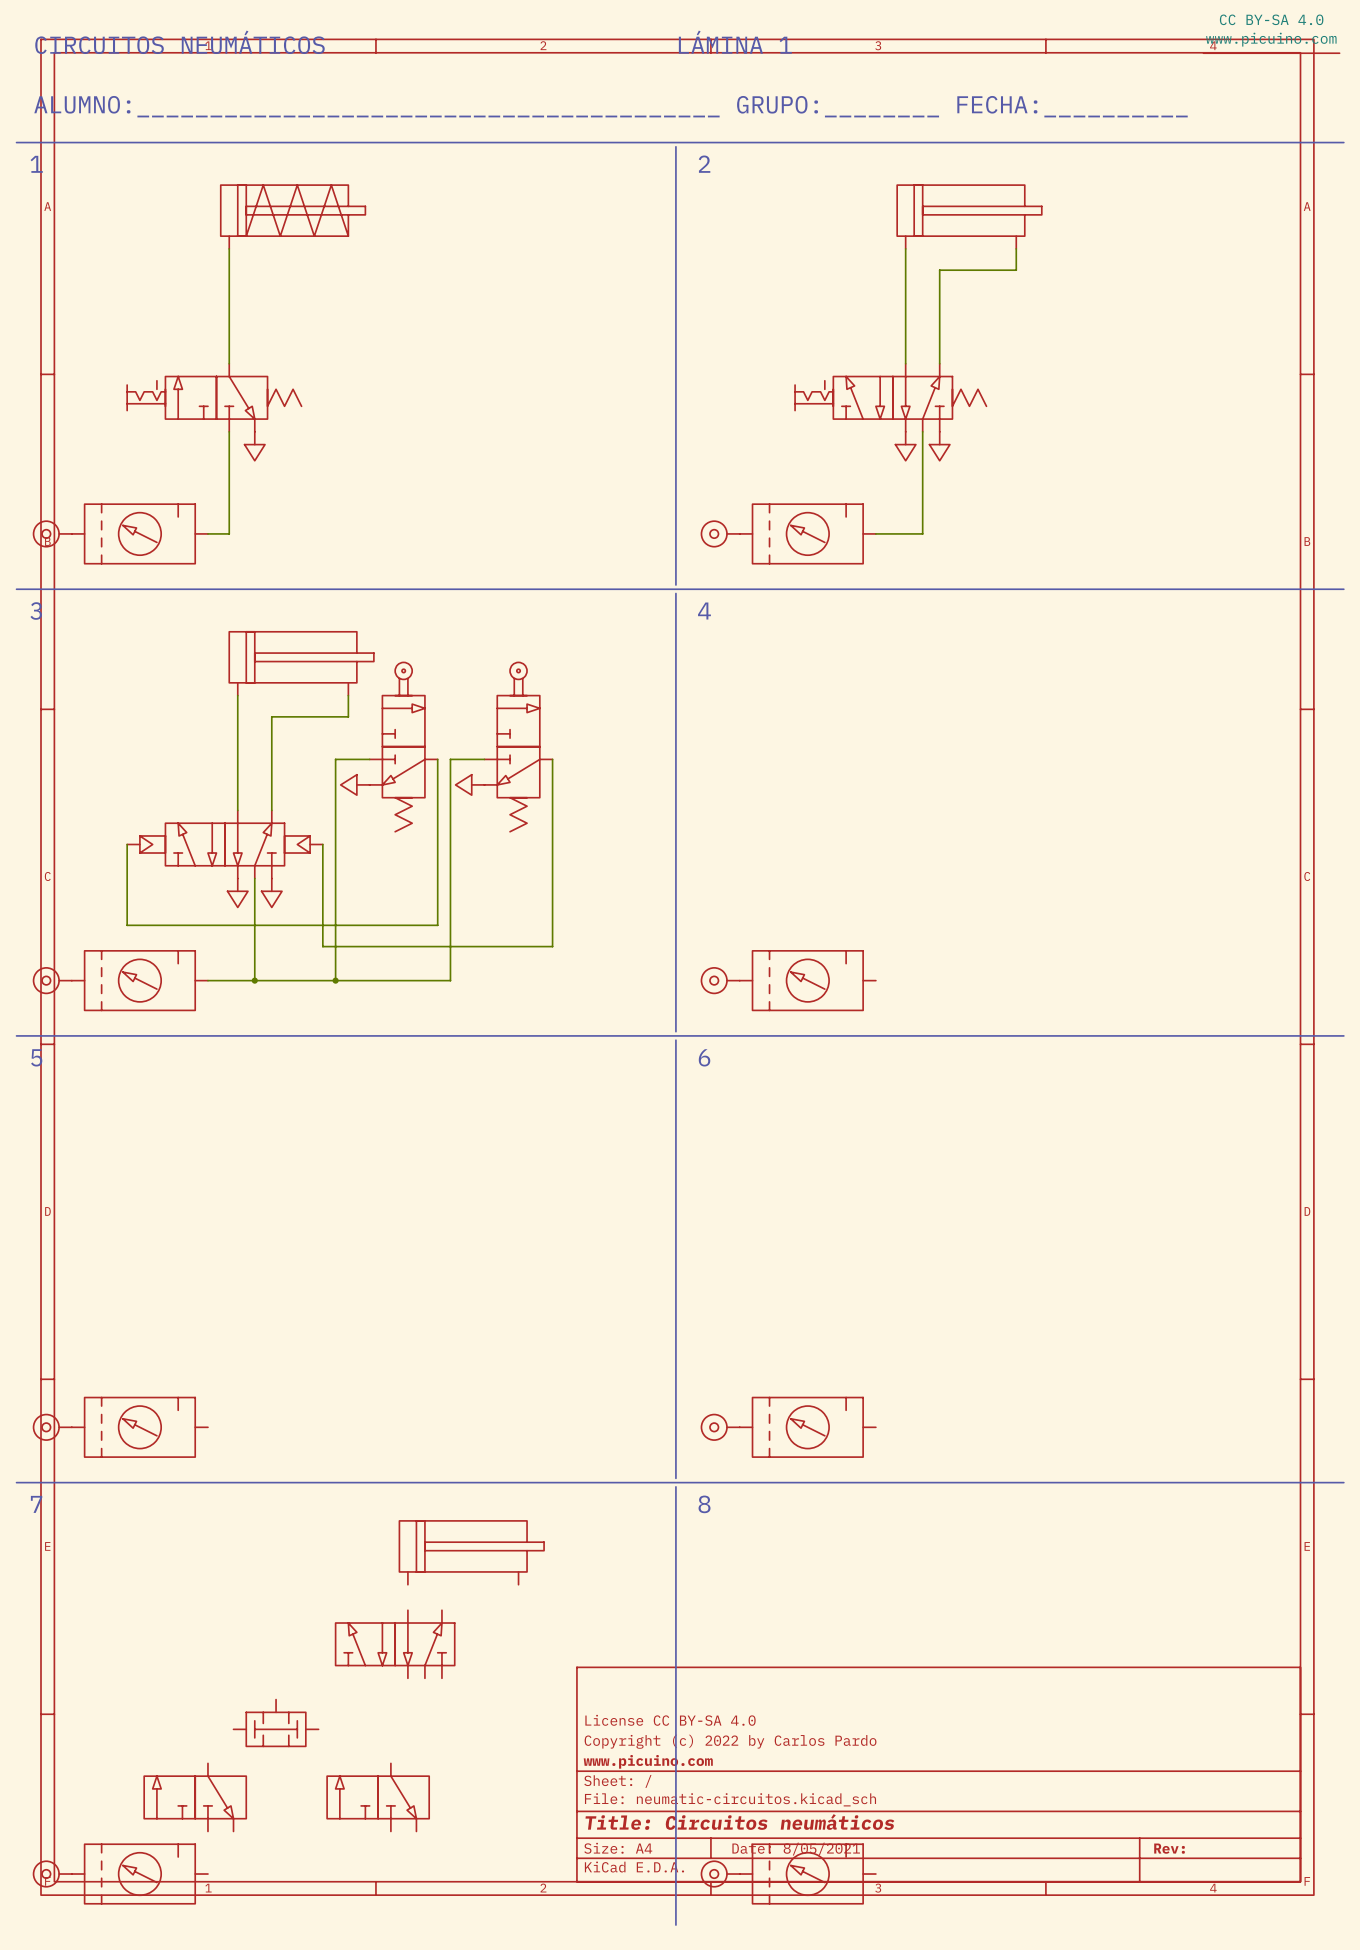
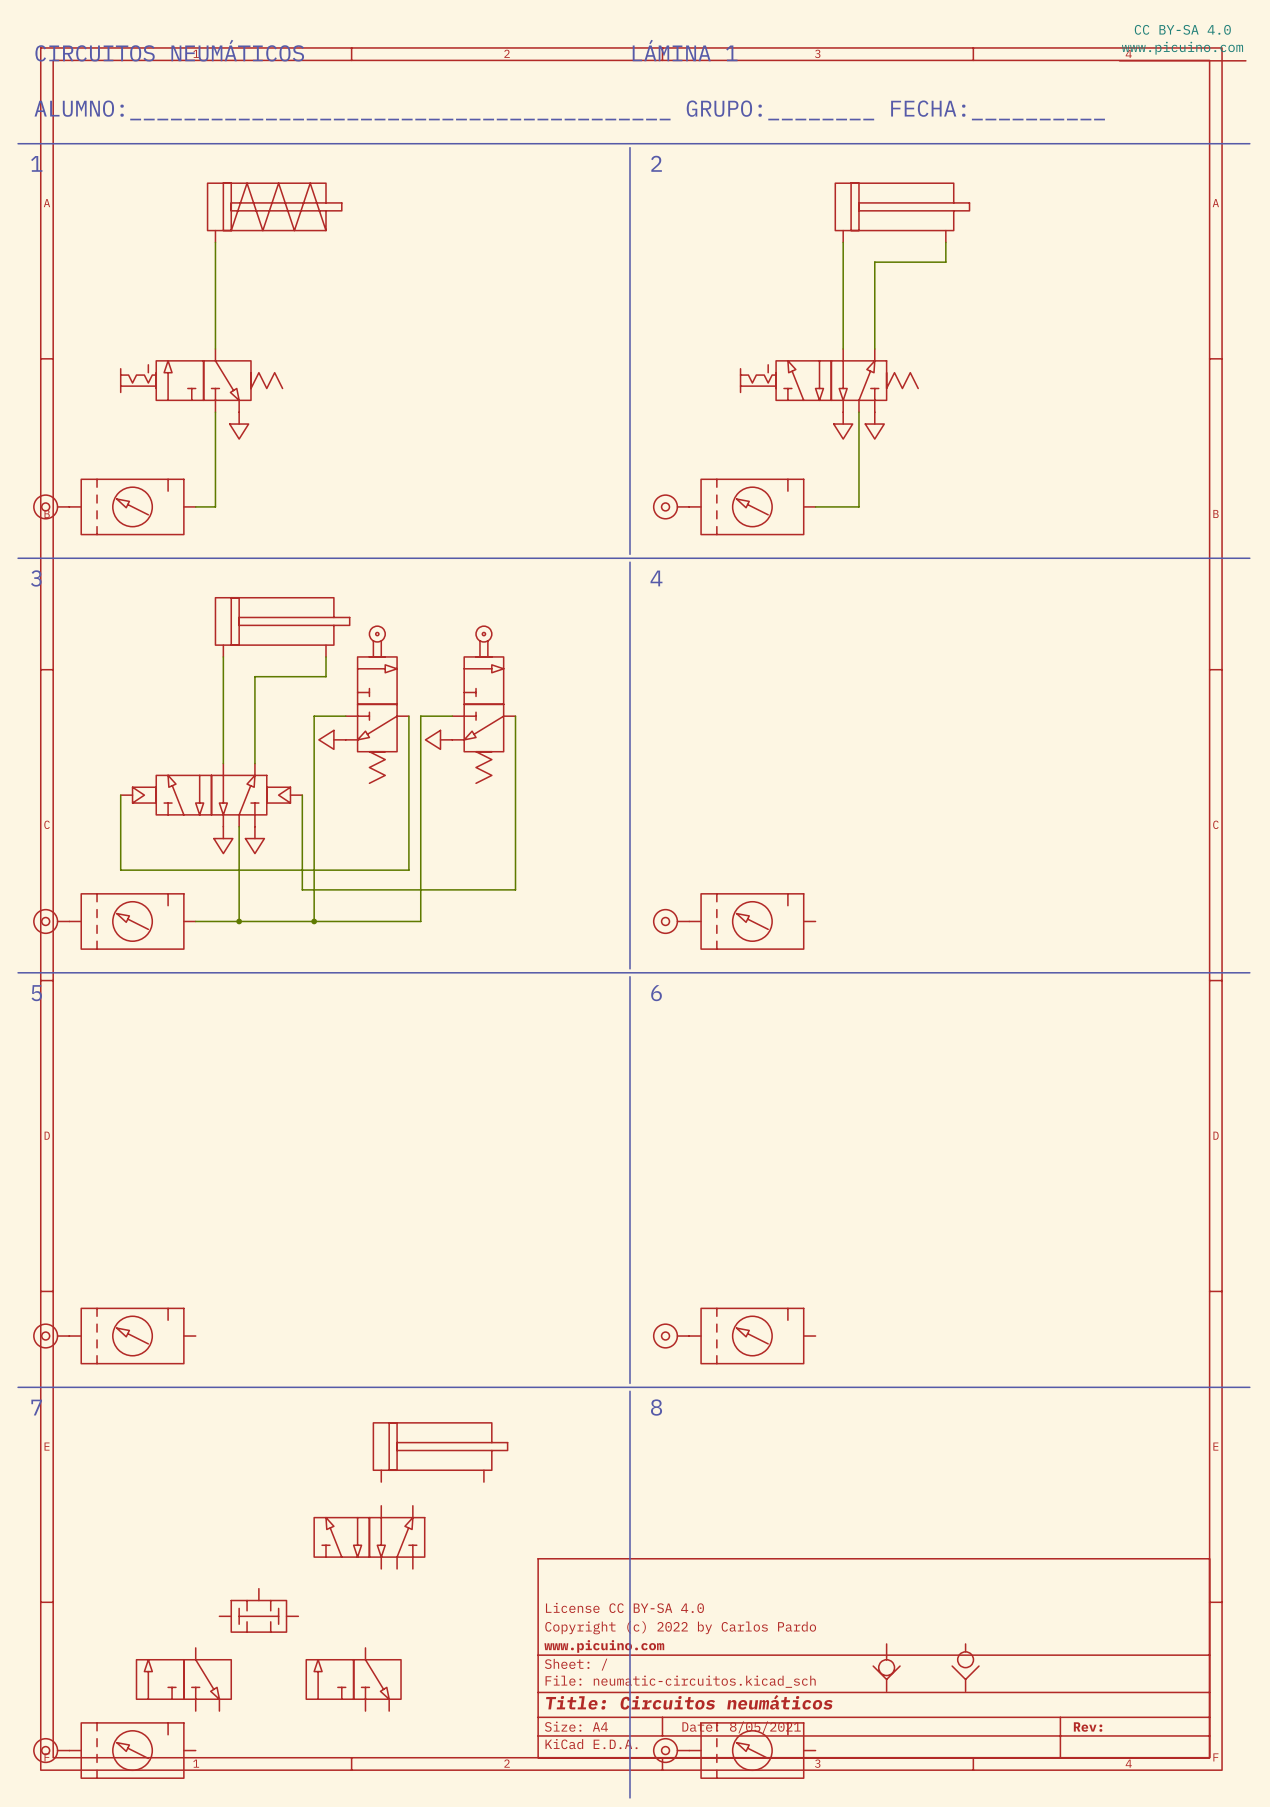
part: none -> (886, 1667)
part: none -> (965, 1667)

